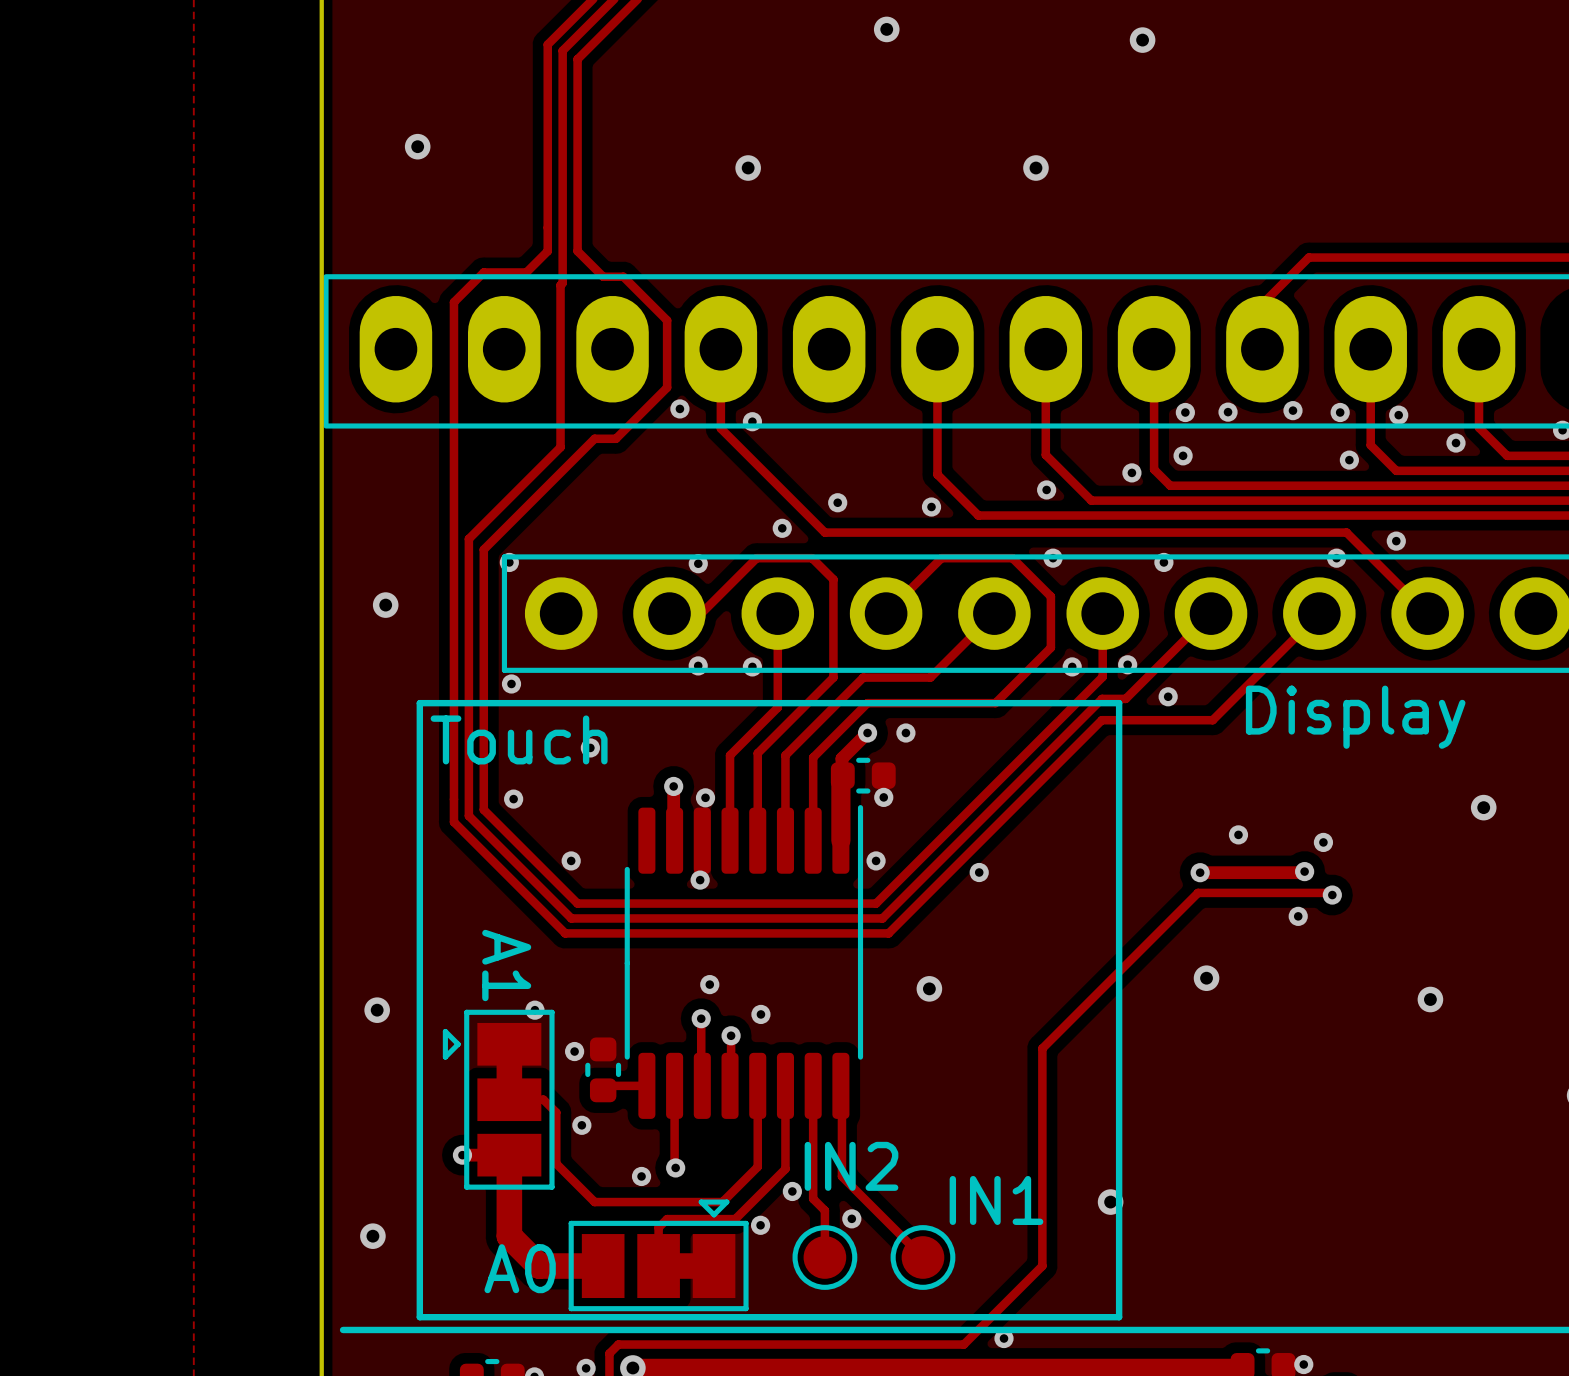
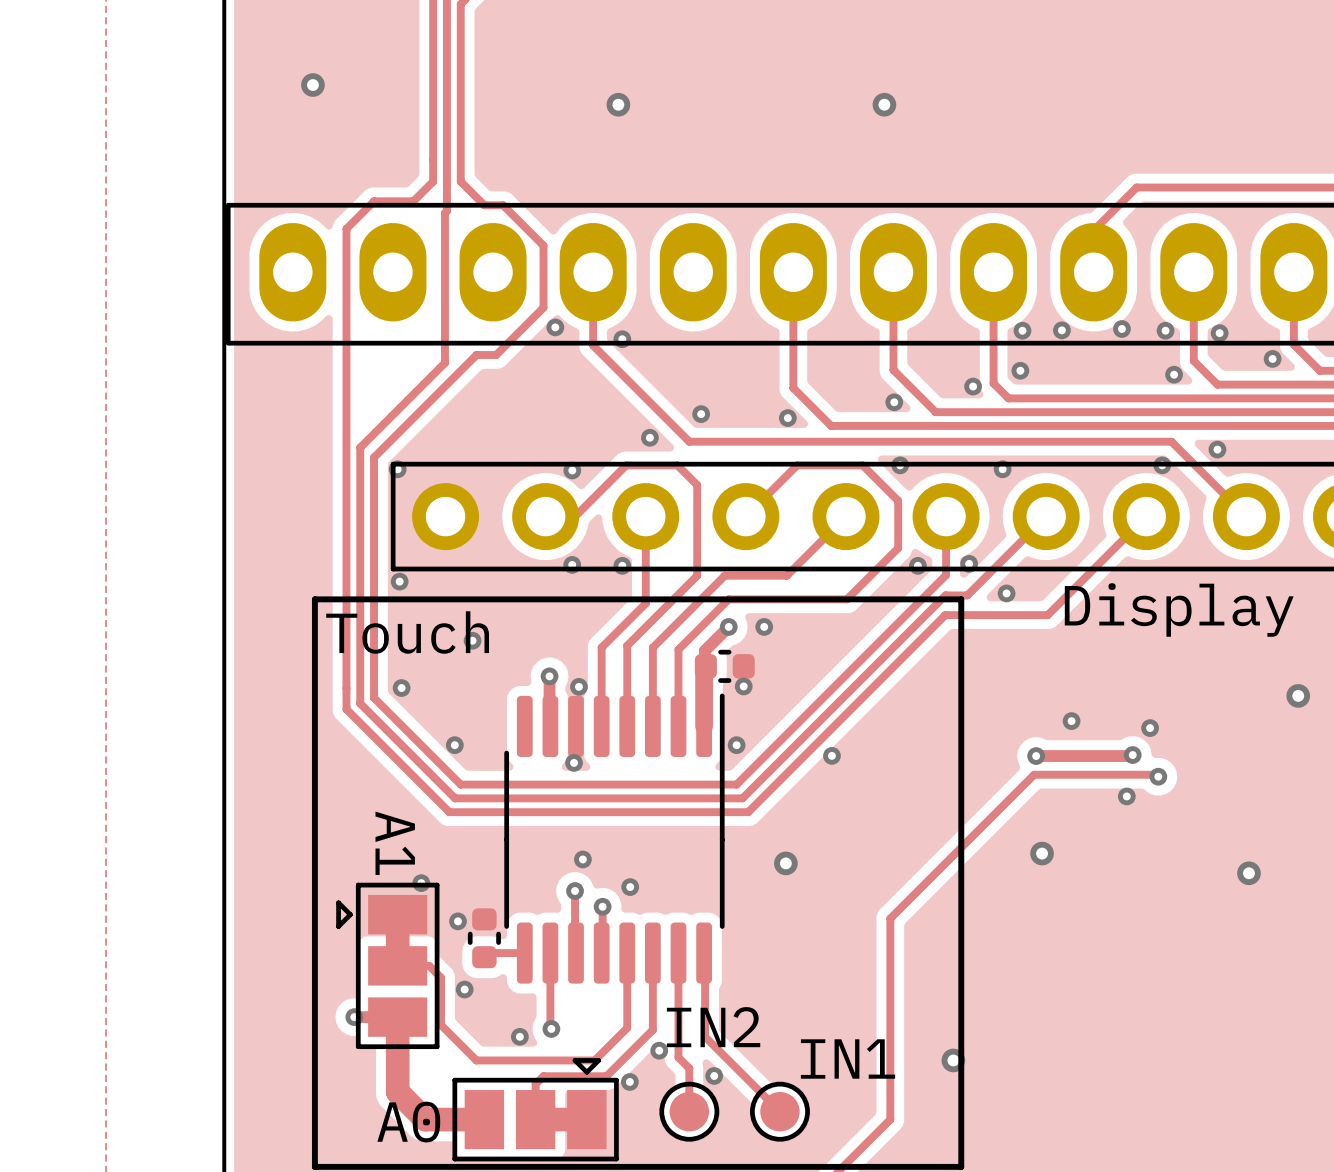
via: (385, 605) -> none
via: (377, 1010) -> none
via: (372, 1236) -> none

